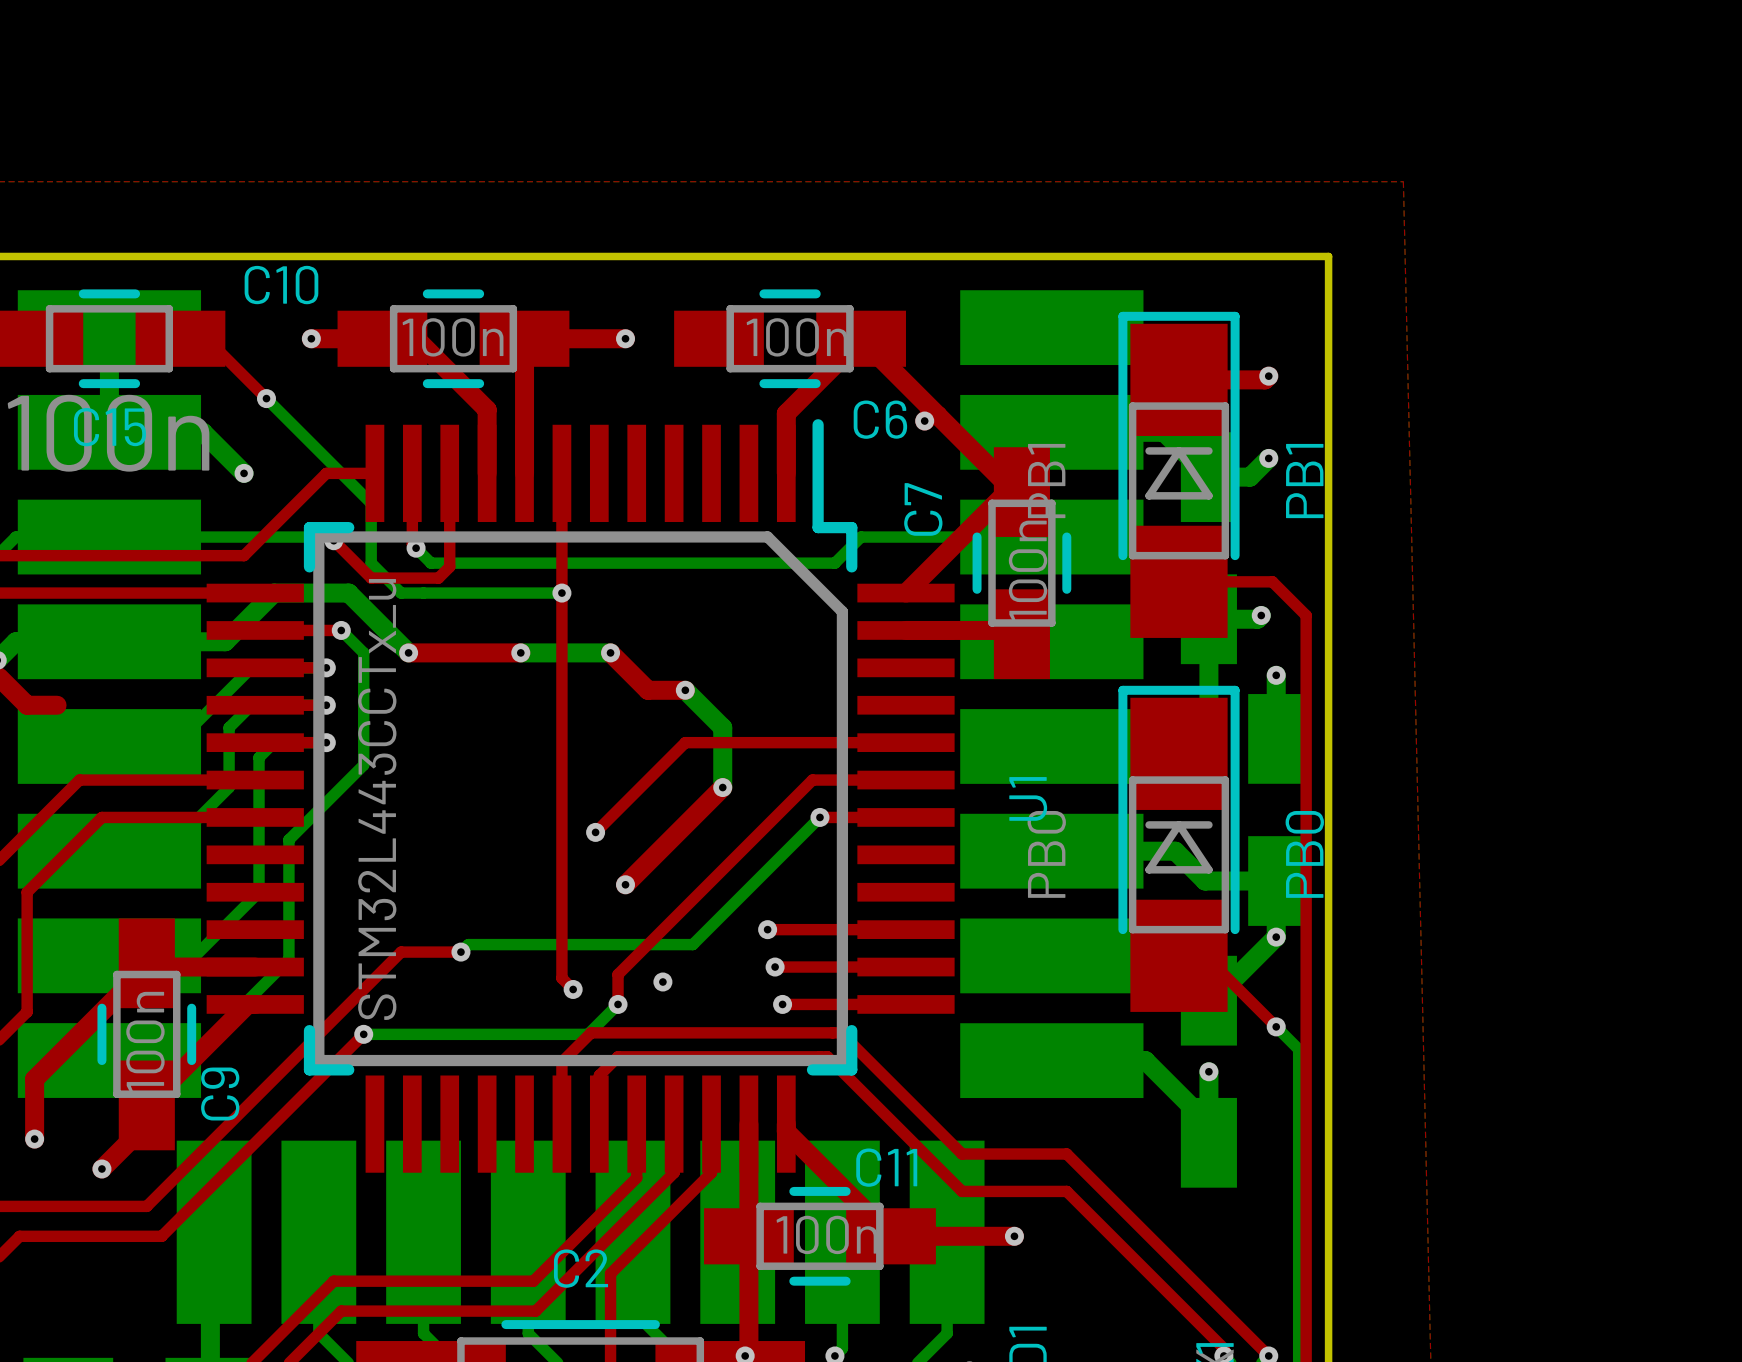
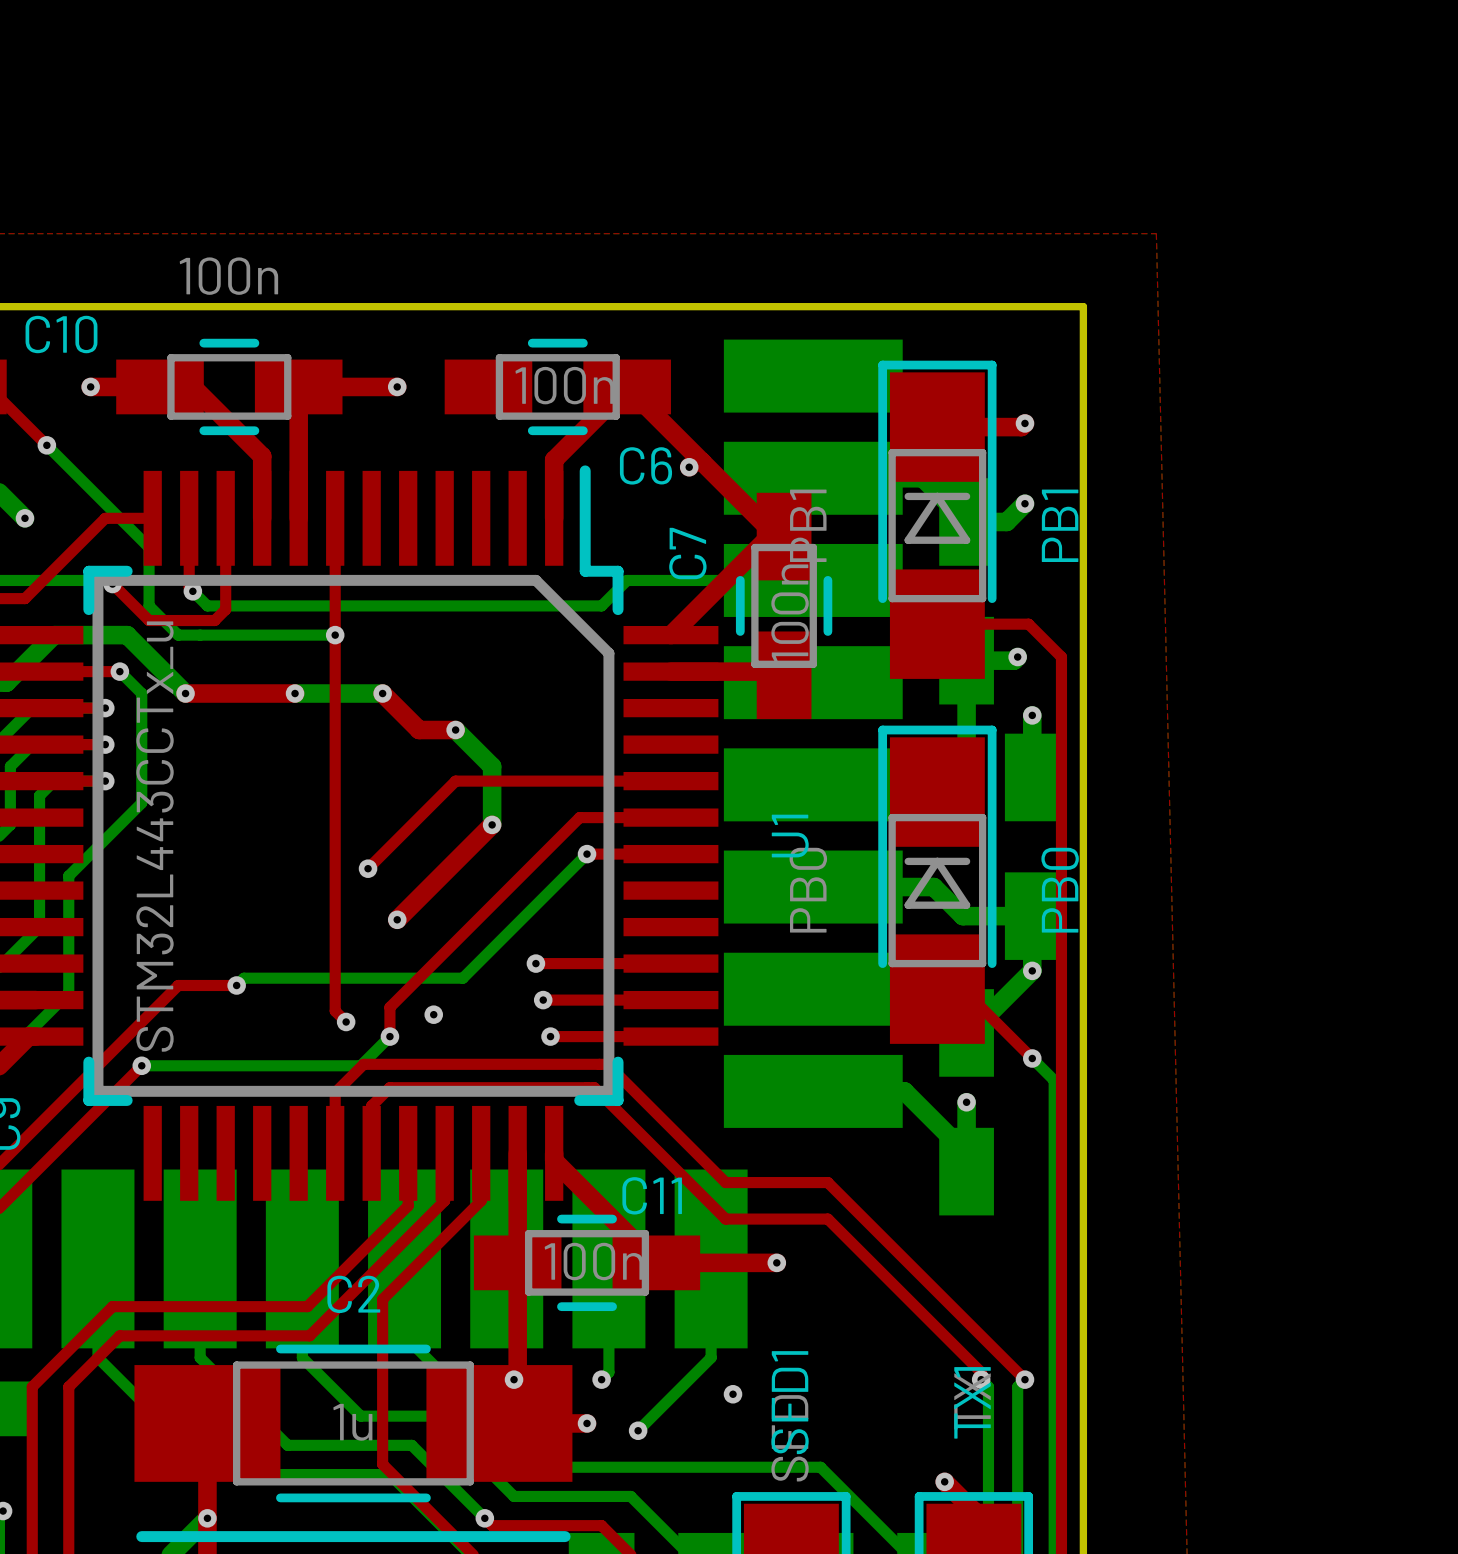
C10 value position: 100n (453, 337) -> 100n (228, 276)

